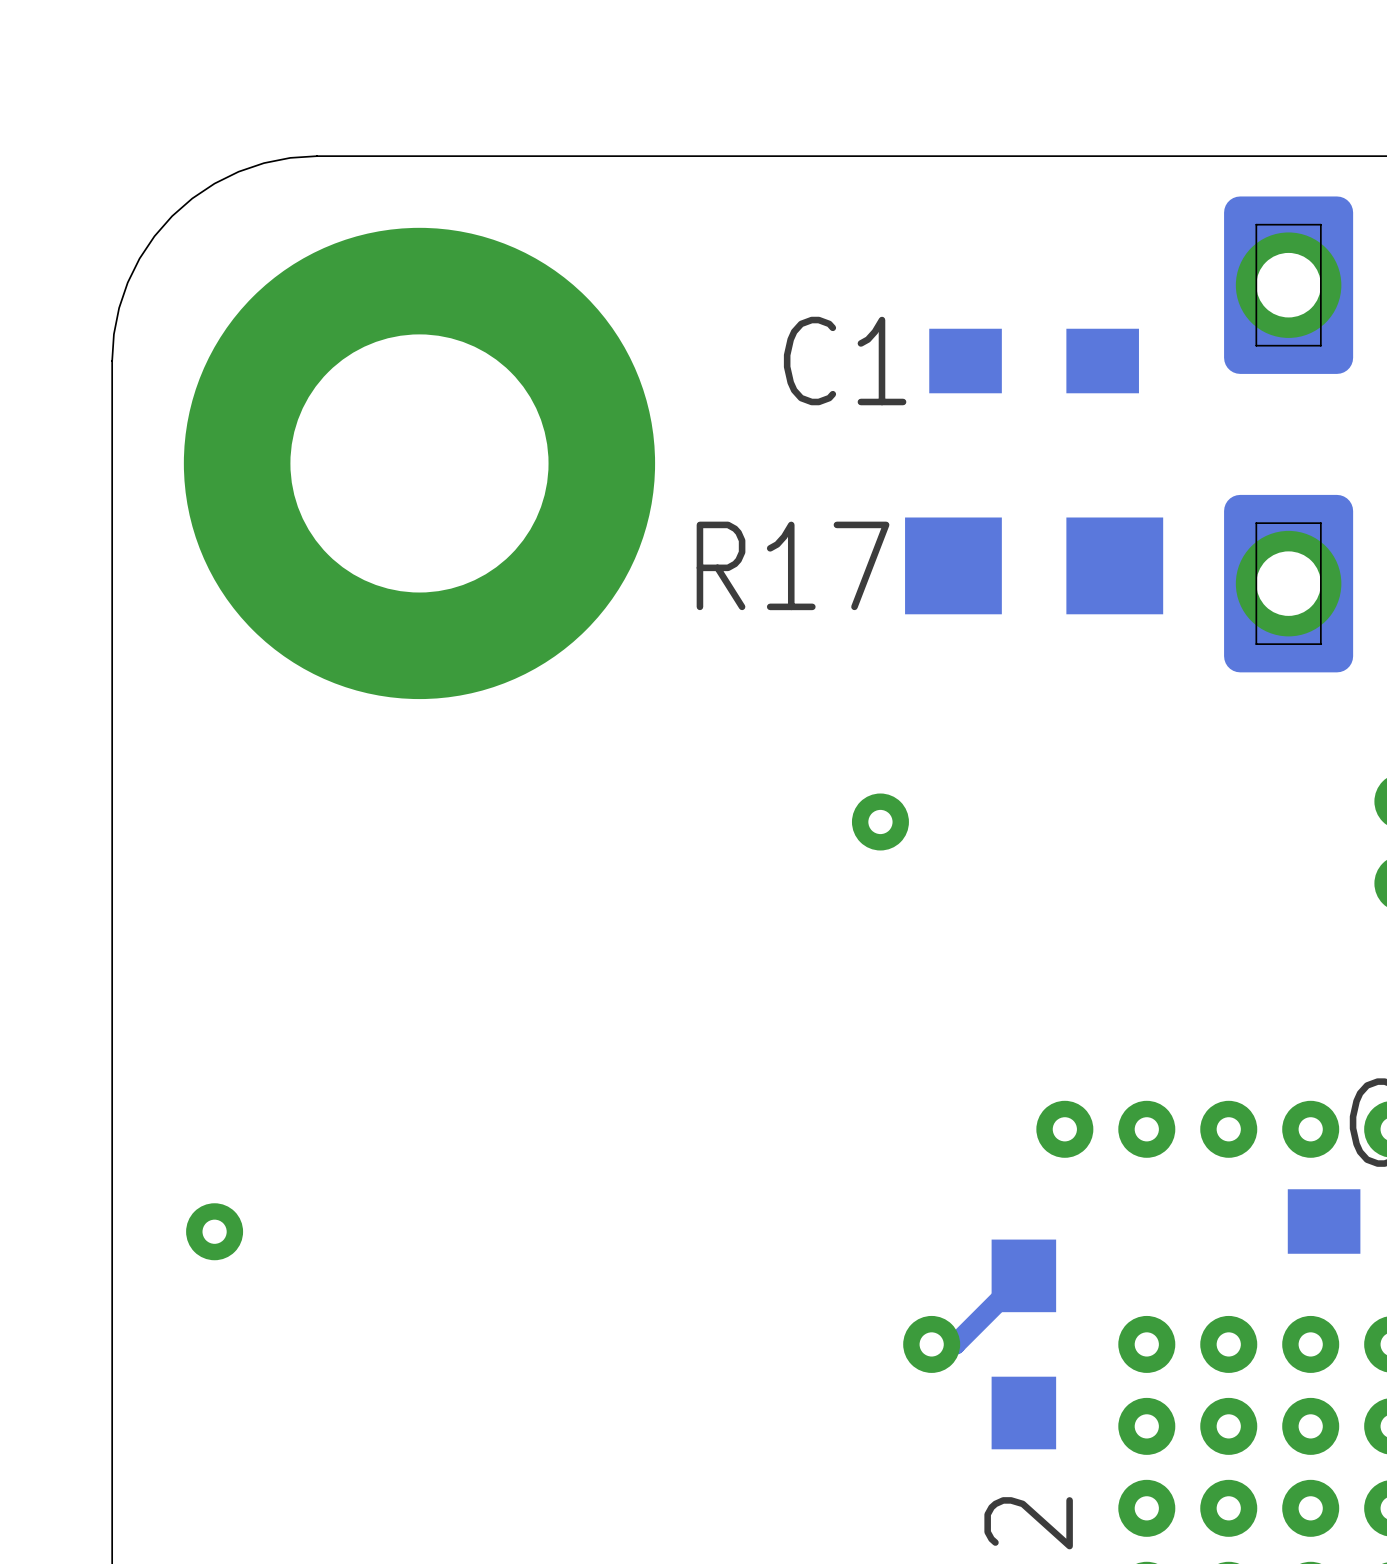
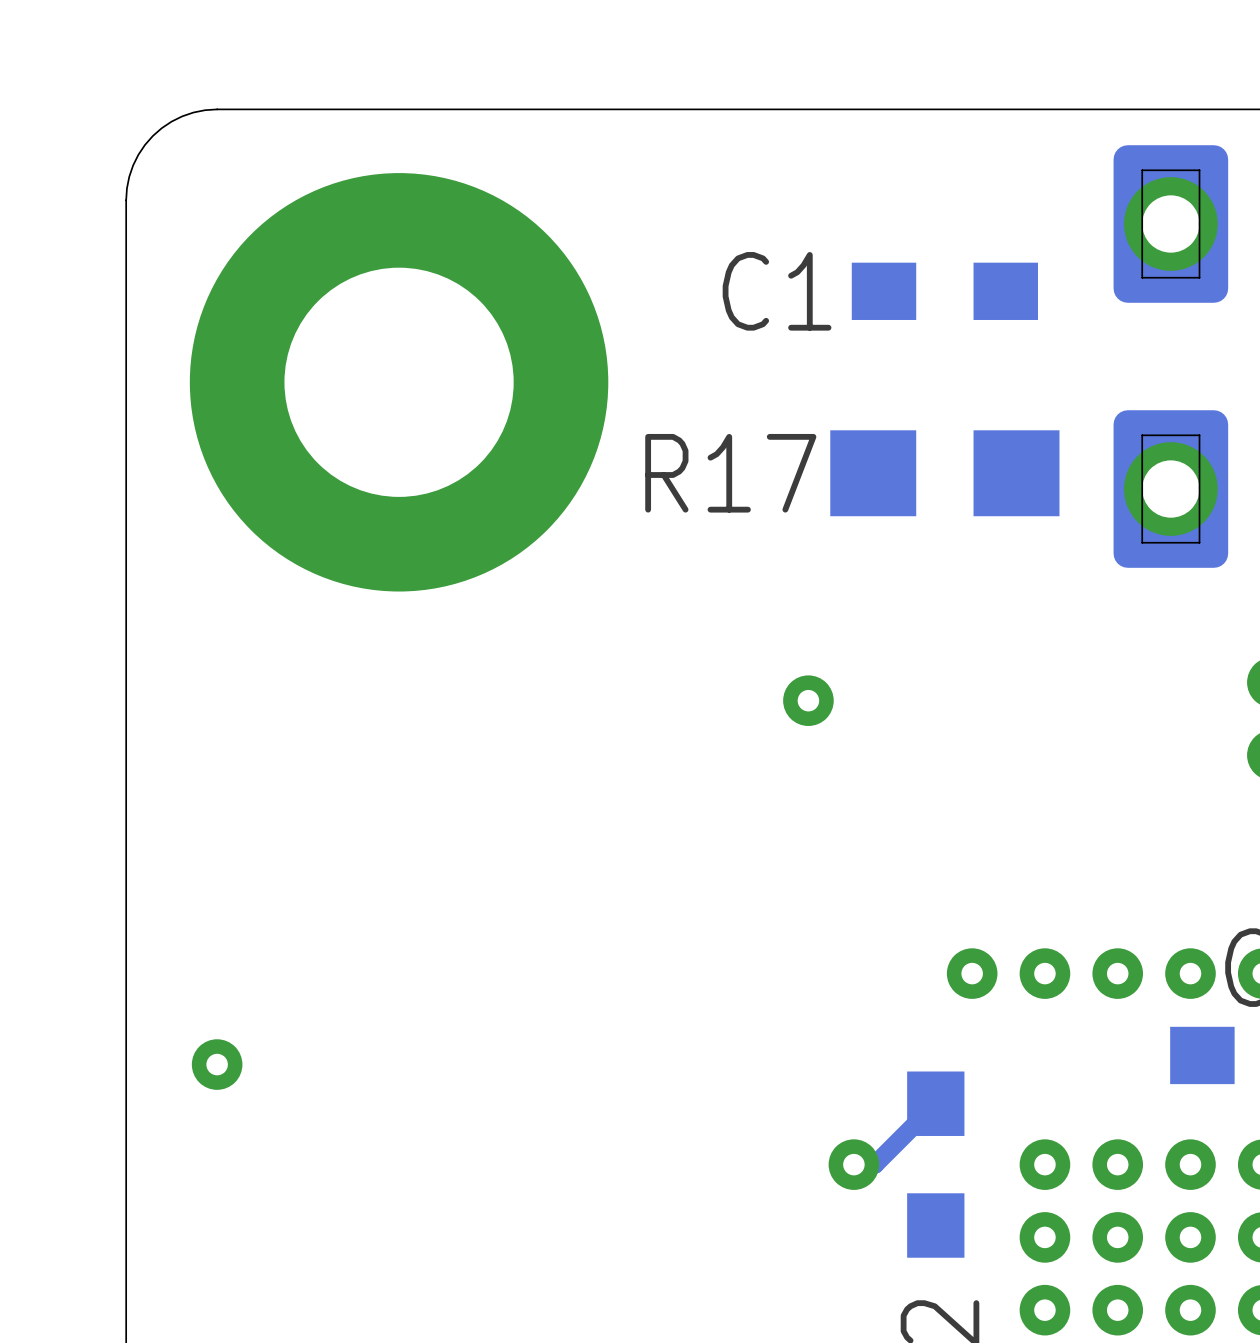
board edge: (317, 156) (290, 157) (264, 163) (238, 171) (214, 183) (192, 198) (172, 216) (154, 236) (139, 258) (127, 282) (119, 307) (113, 334) (112, 361) -> (308, 109) (205, 110) (193, 112) (171, 121) (152, 136) (138, 154) (129, 176) (126, 188) (126, 291)

